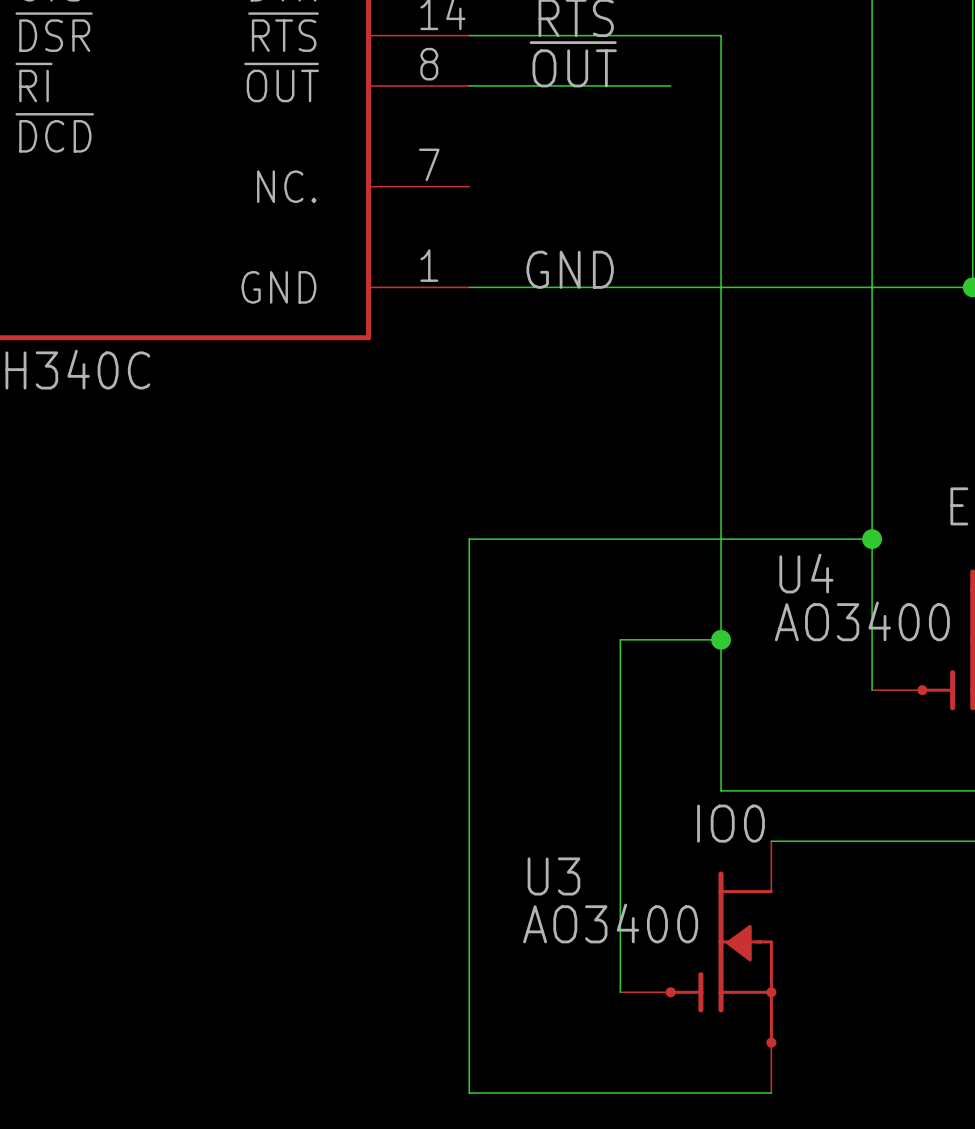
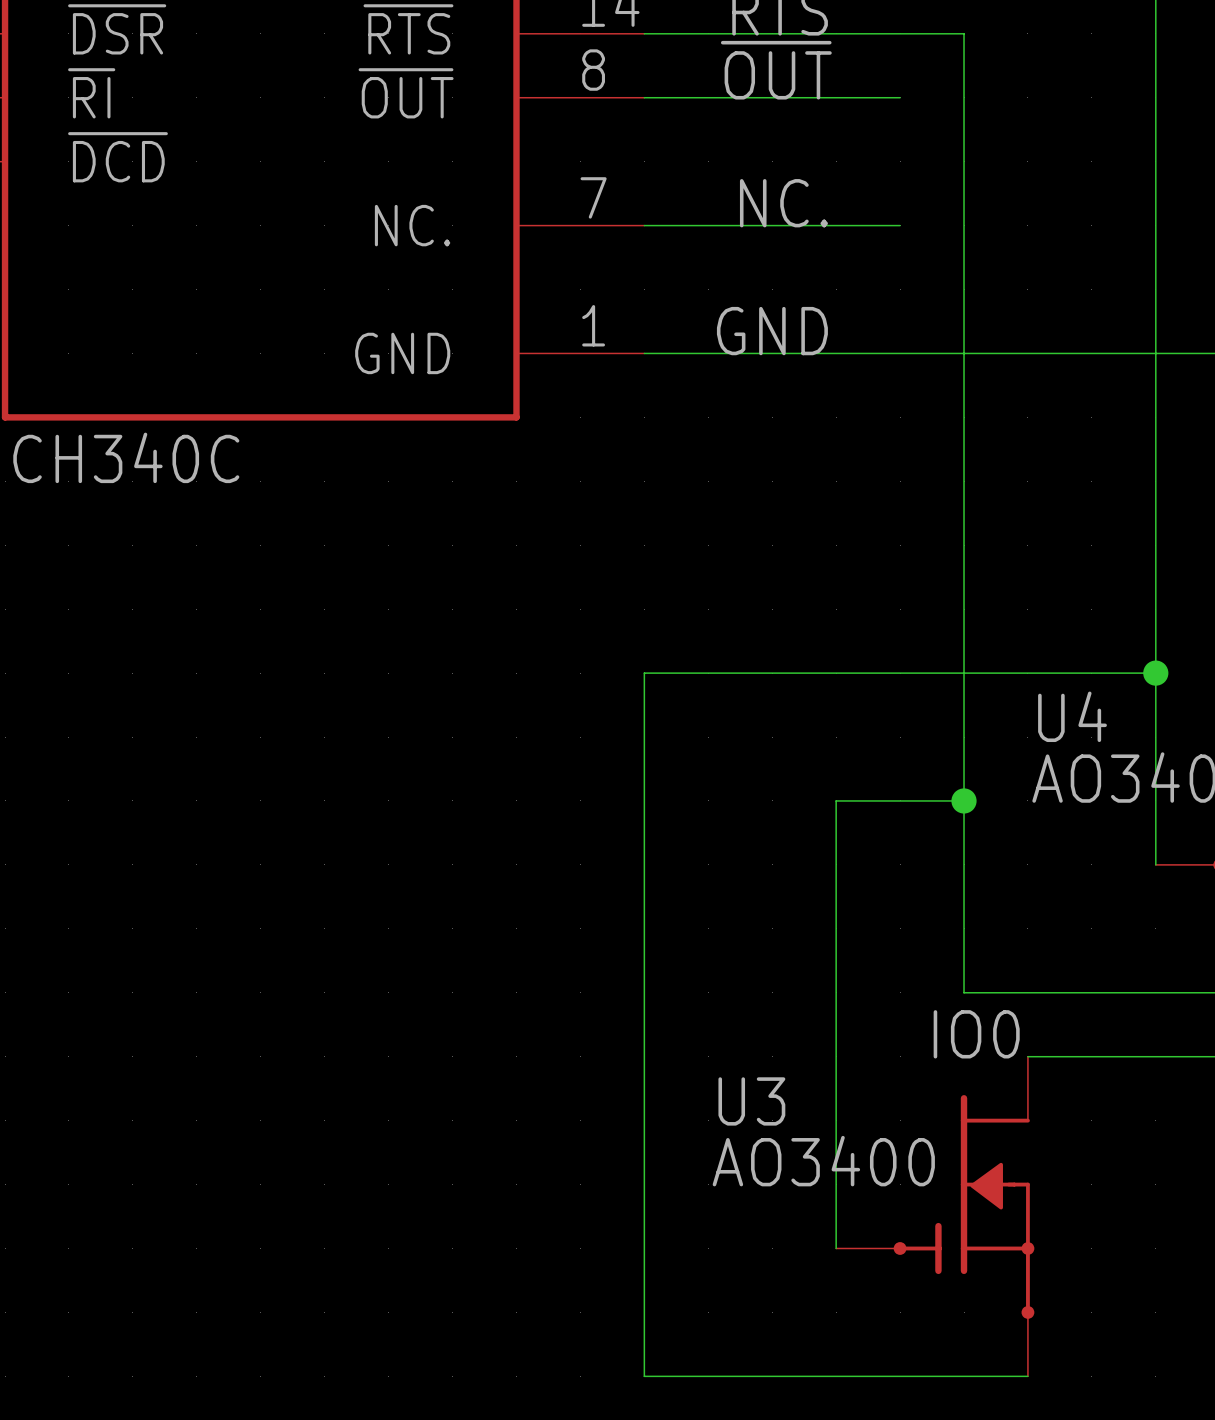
label: none -> NC. (783, 203)
wire: none -> (644, 225) (900, 225)

